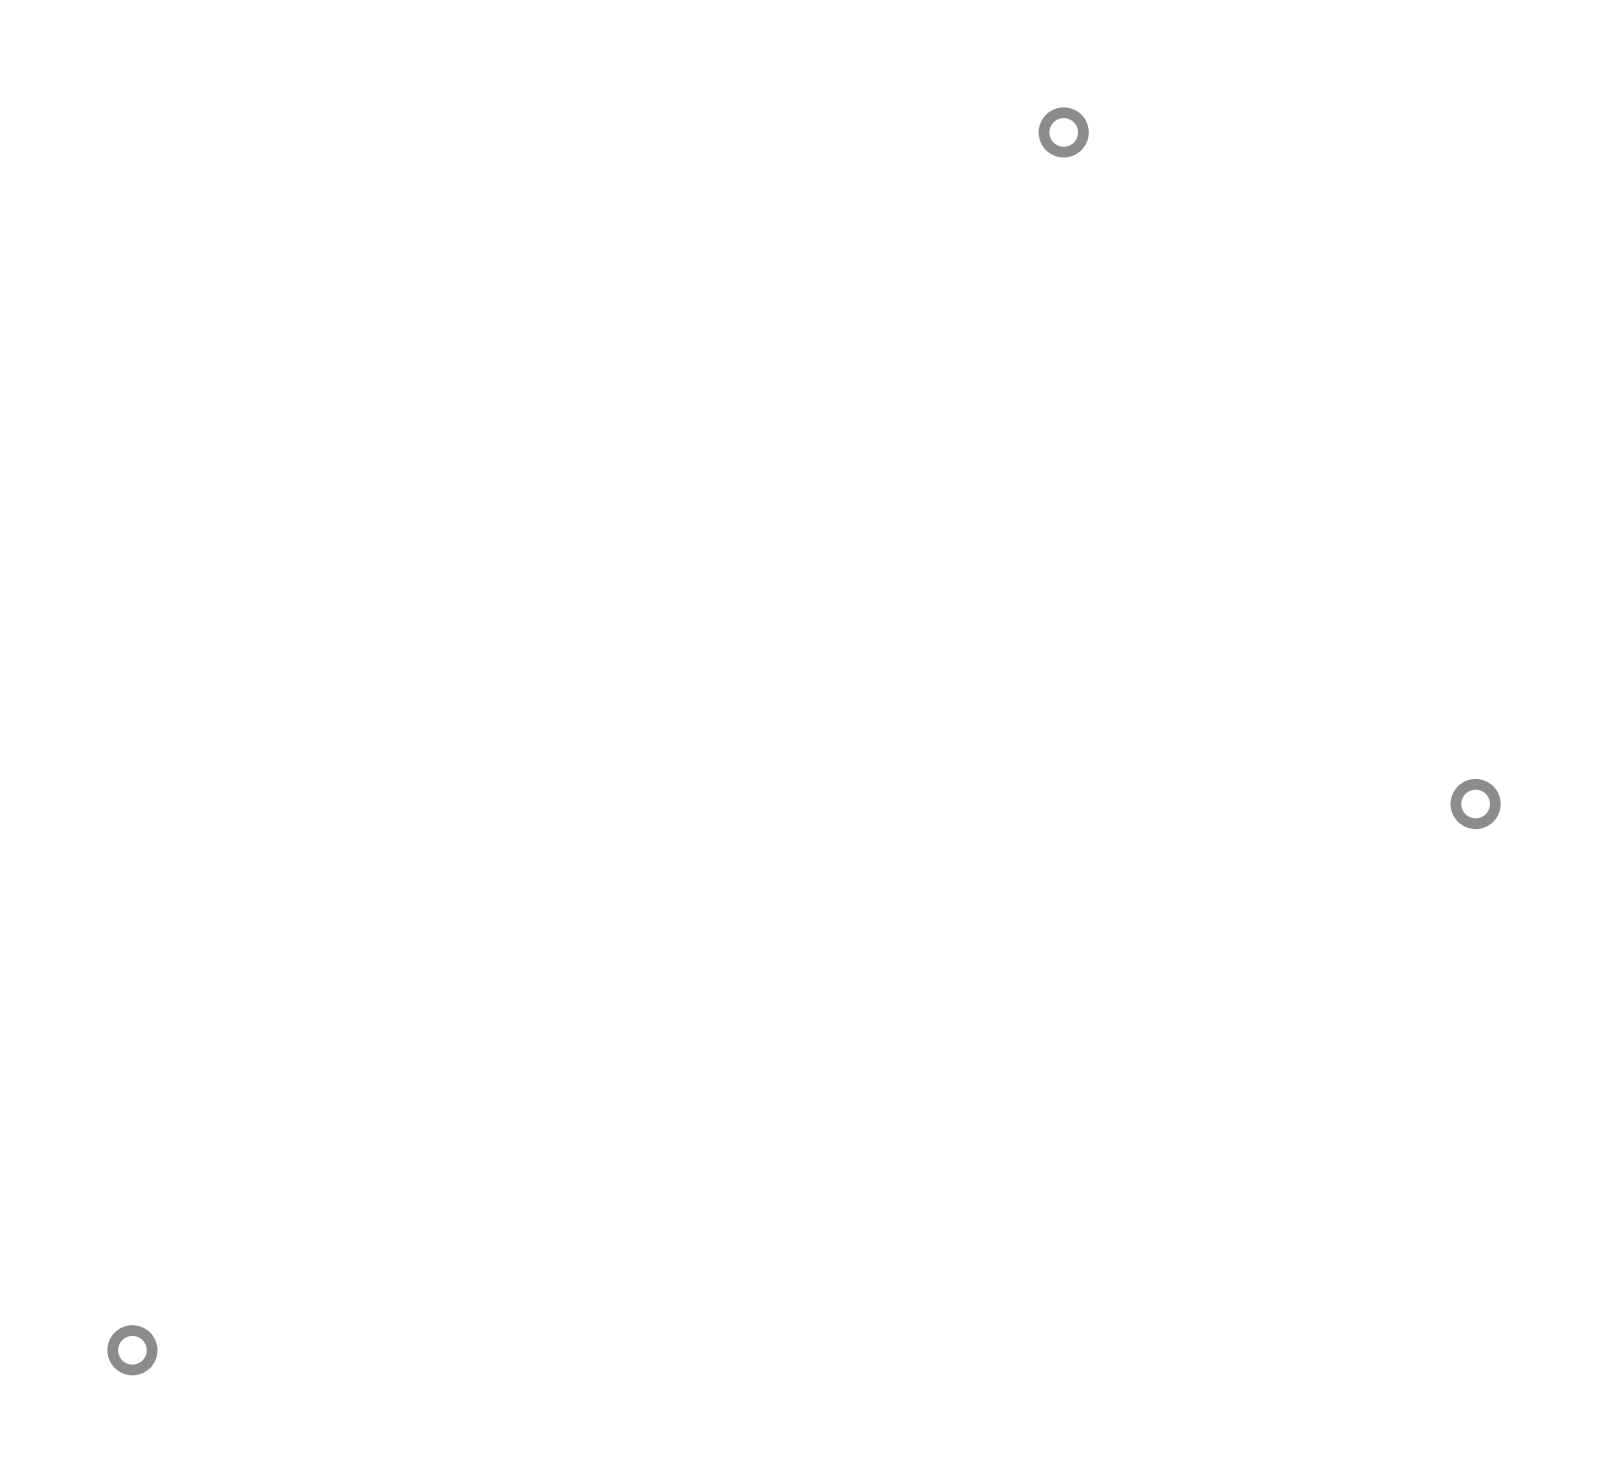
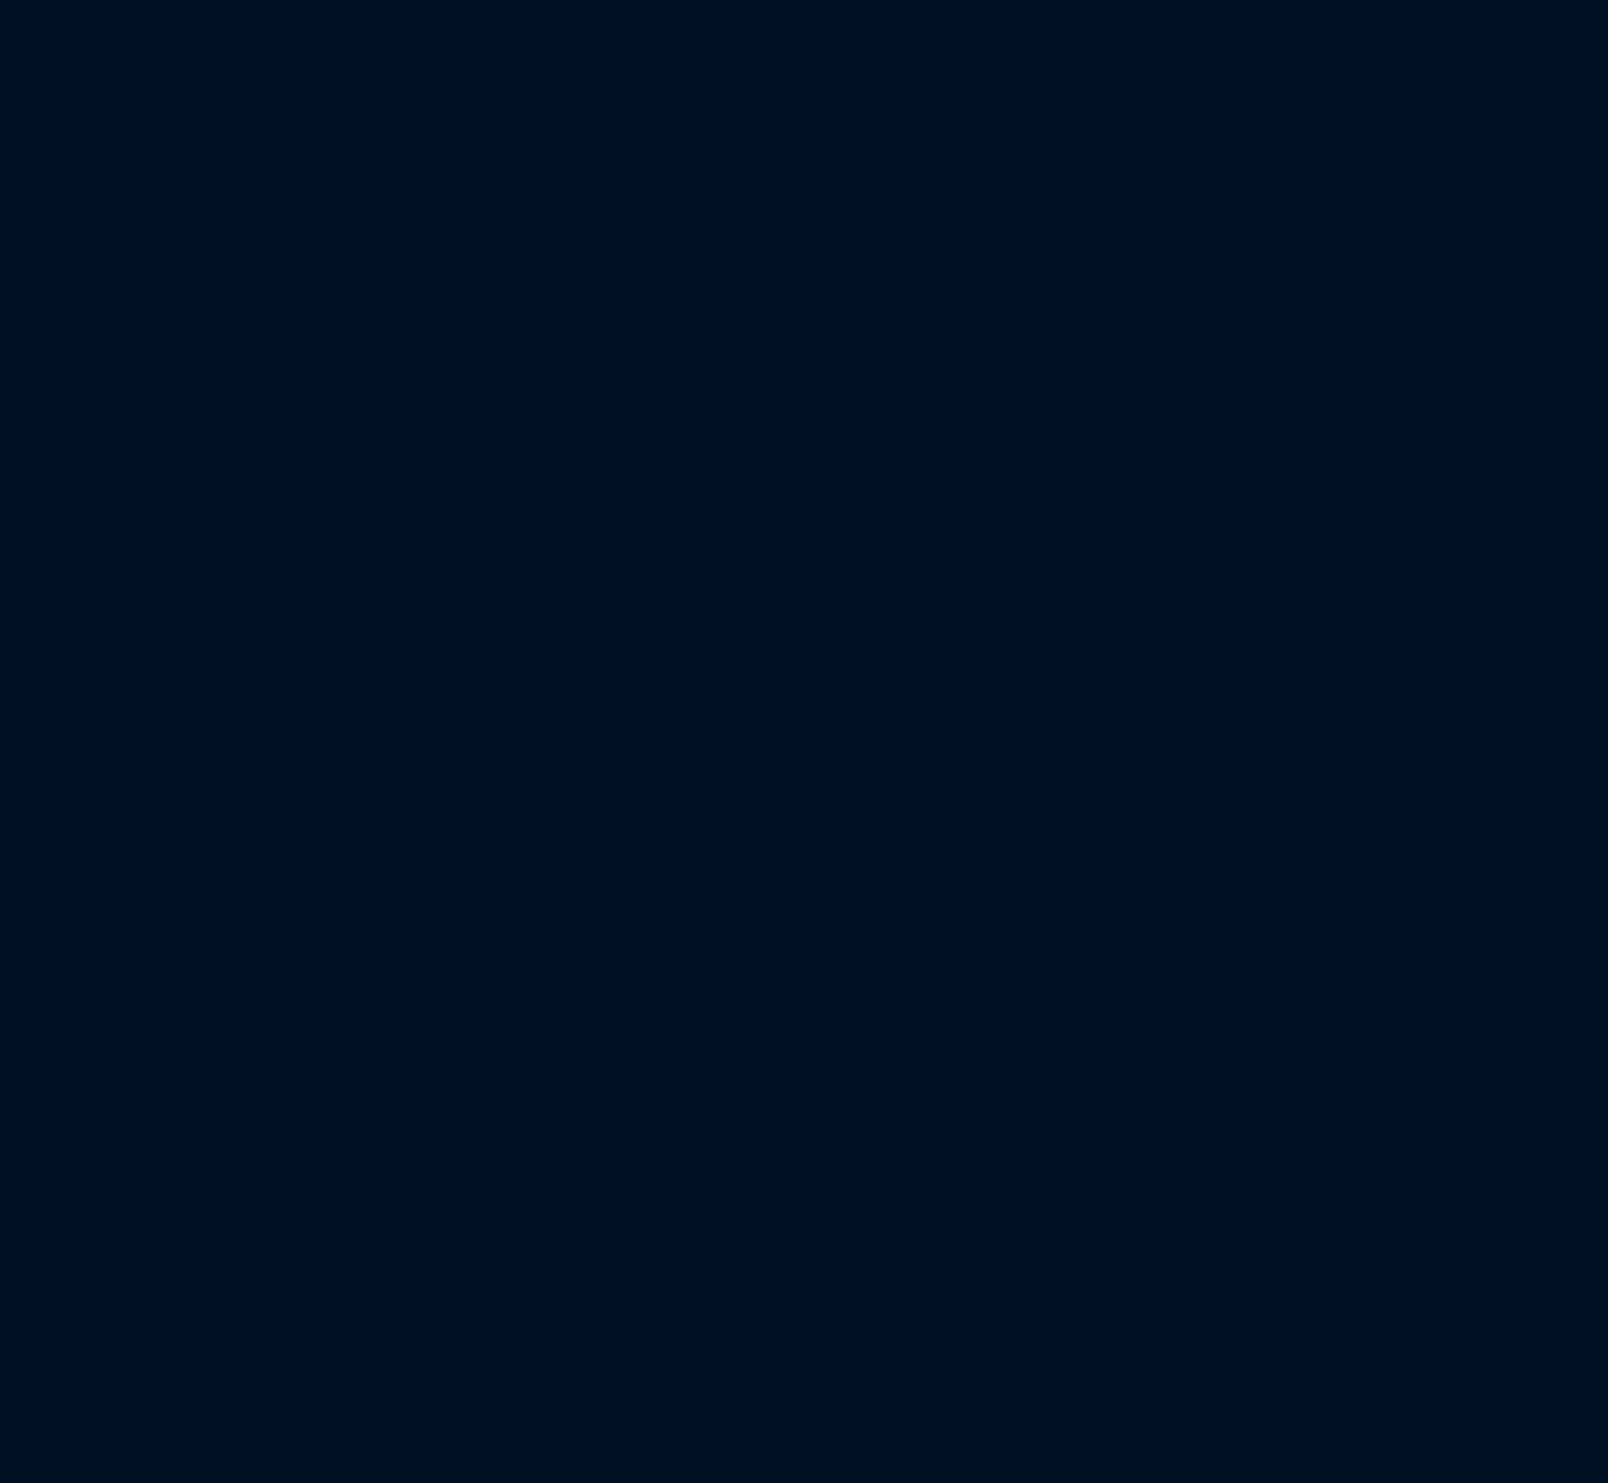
part: (1063, 132) -> none
part: (1475, 804) -> none
part: (132, 1350) -> none

